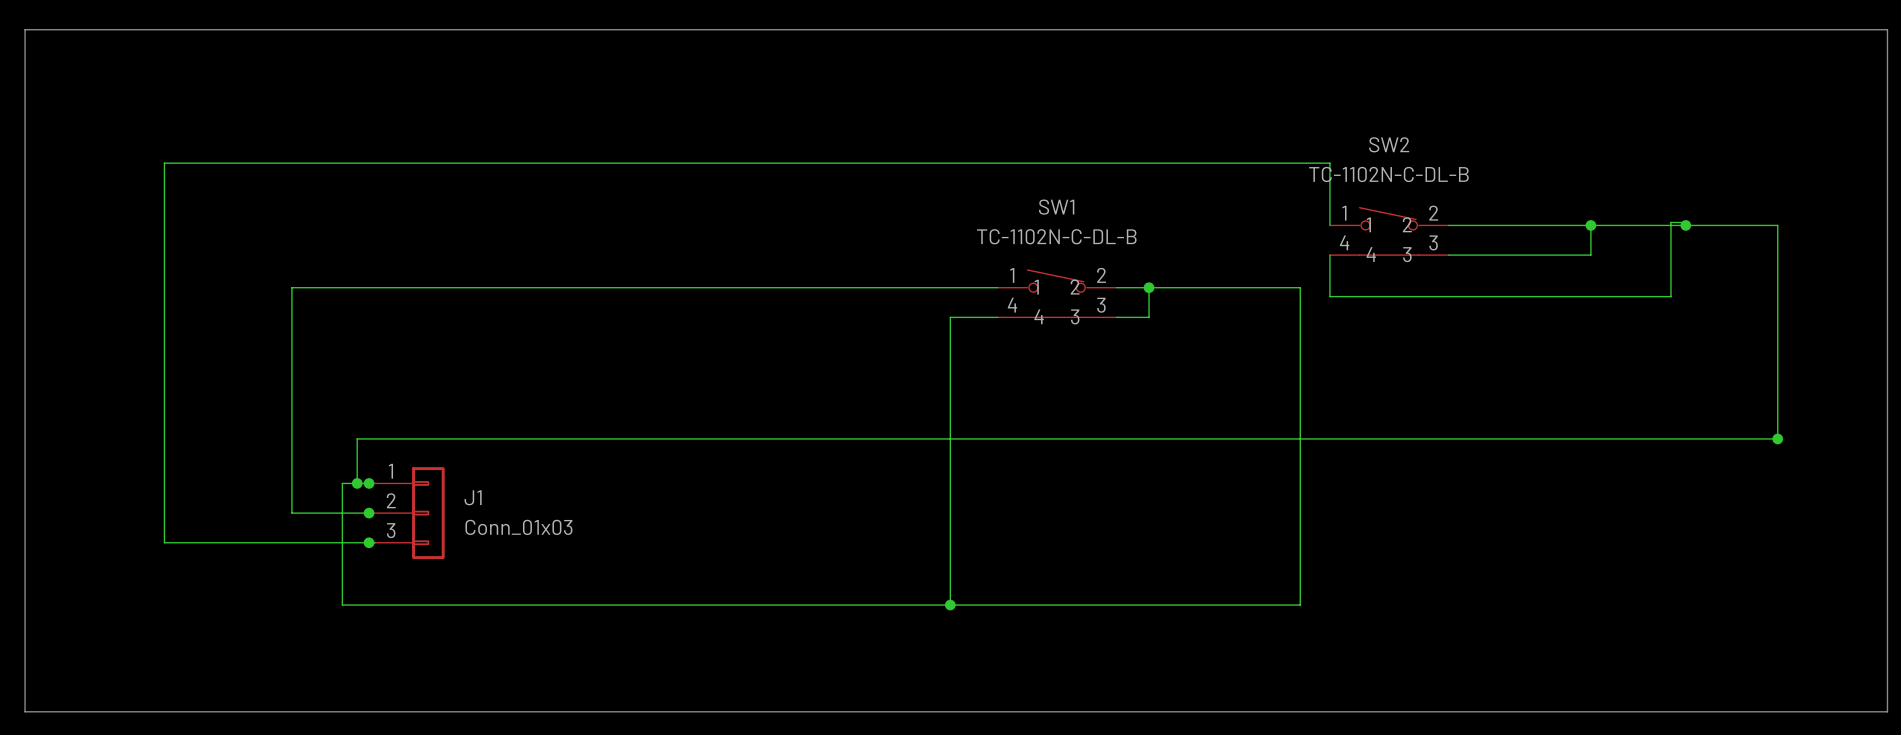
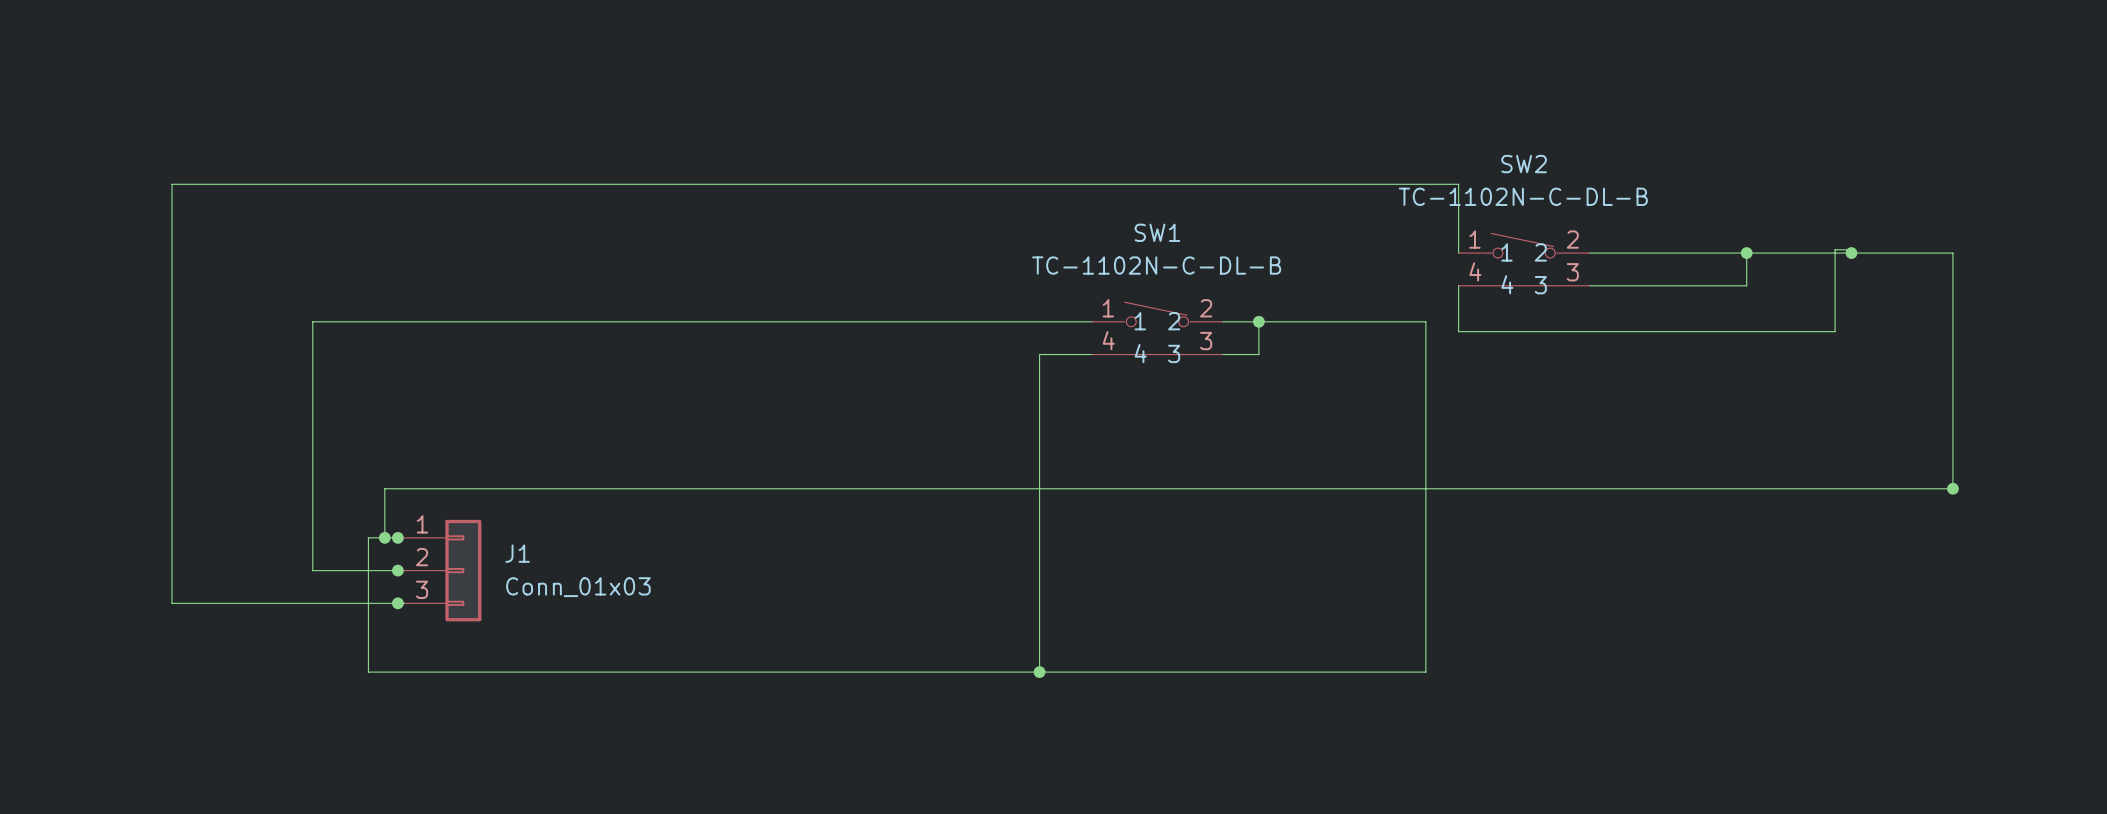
line: (25, 29) (1887, 29) (1887, 711) (25, 711) (25, 29) -> none

